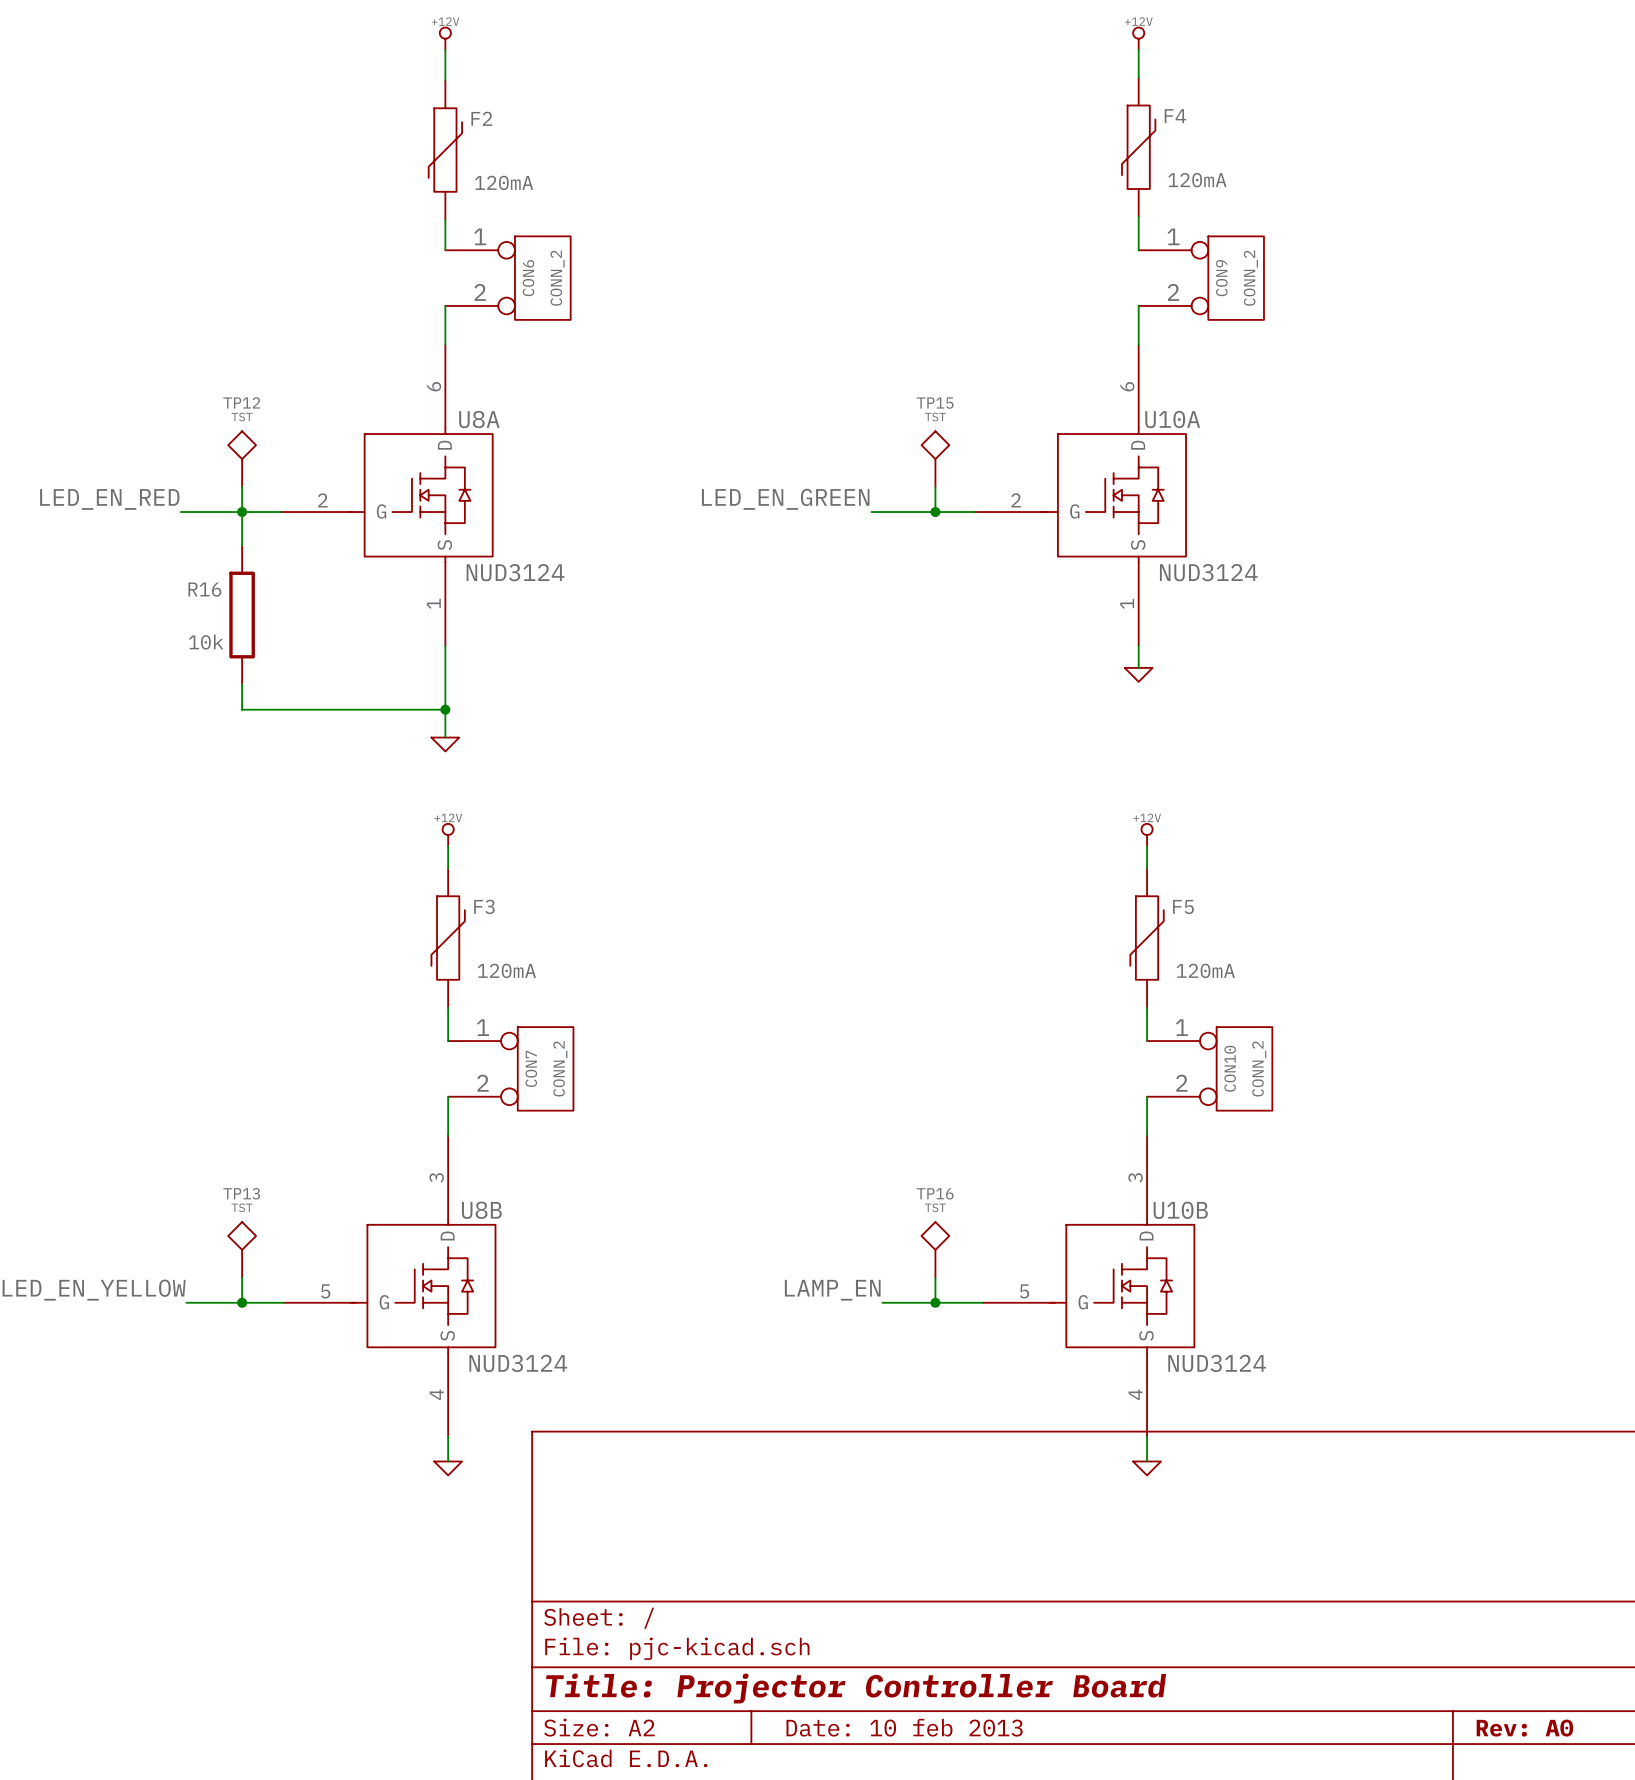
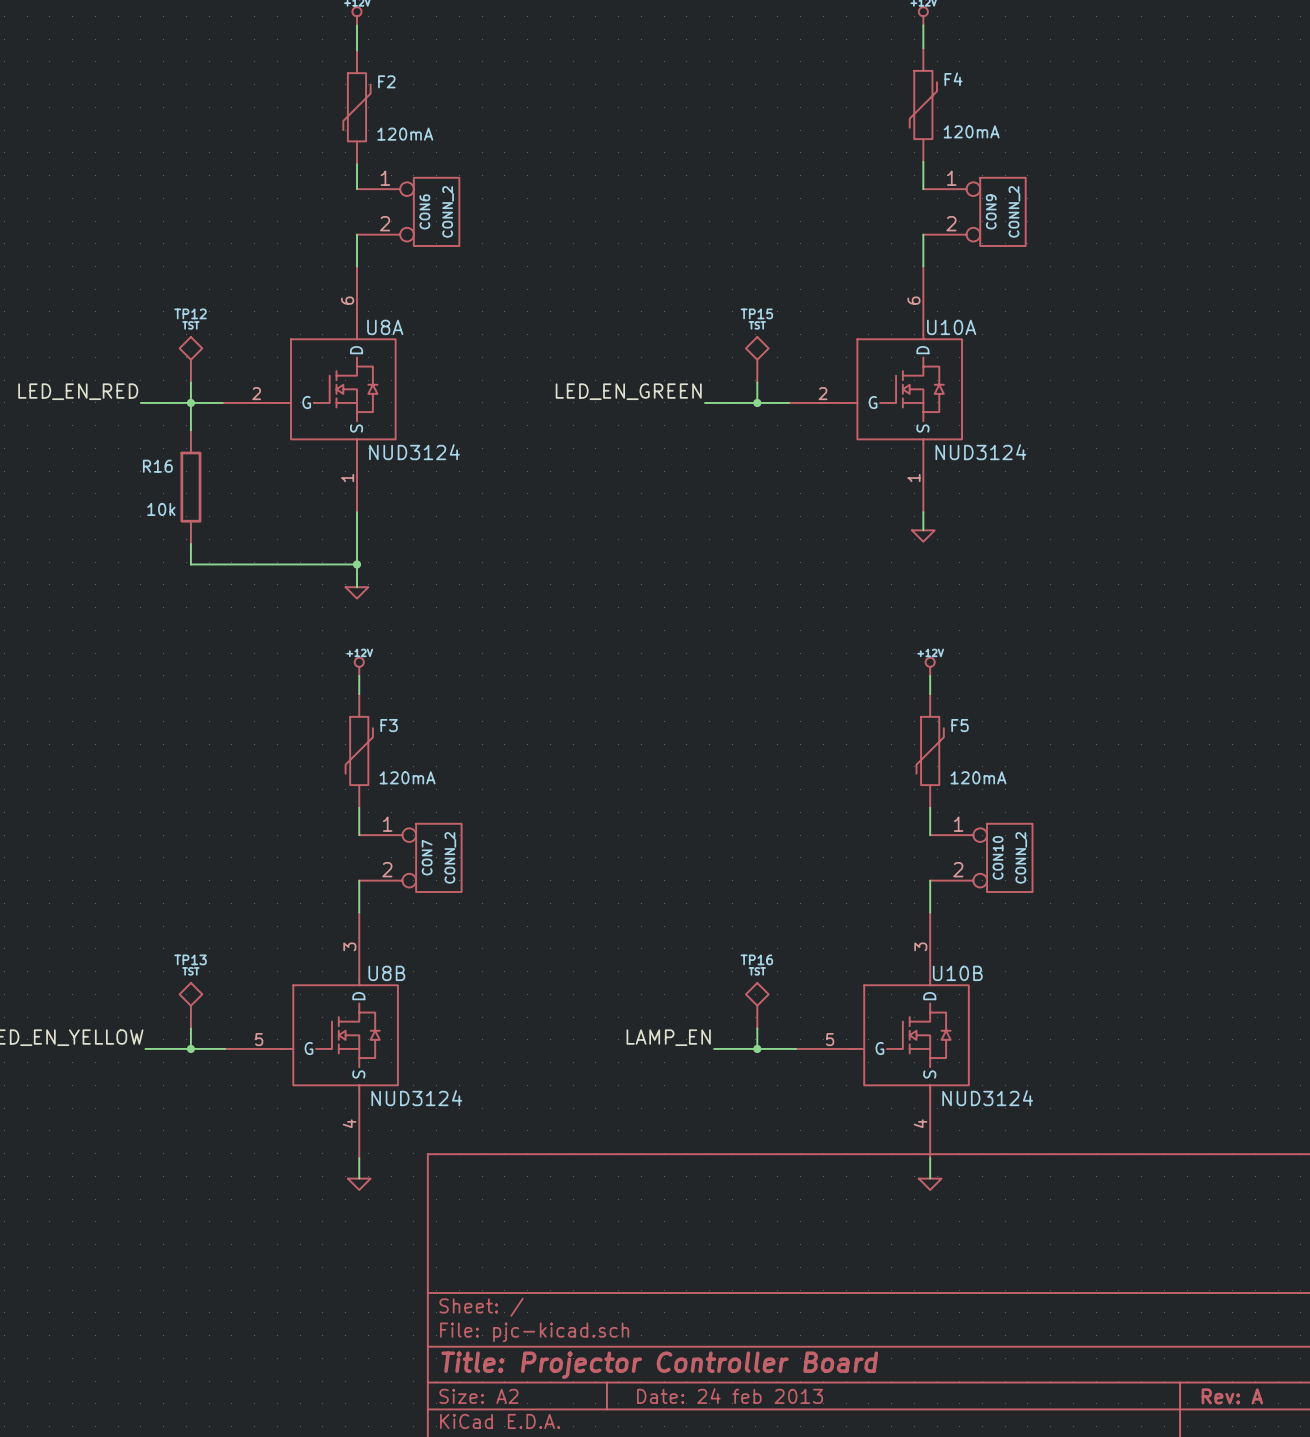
title block: Date: 10 feb 2013 (904, 1727) -> Date: 24 feb 2013 (730, 1396)
title block: Rev: A0 (1524, 1728) -> Rev: A (1232, 1396)

